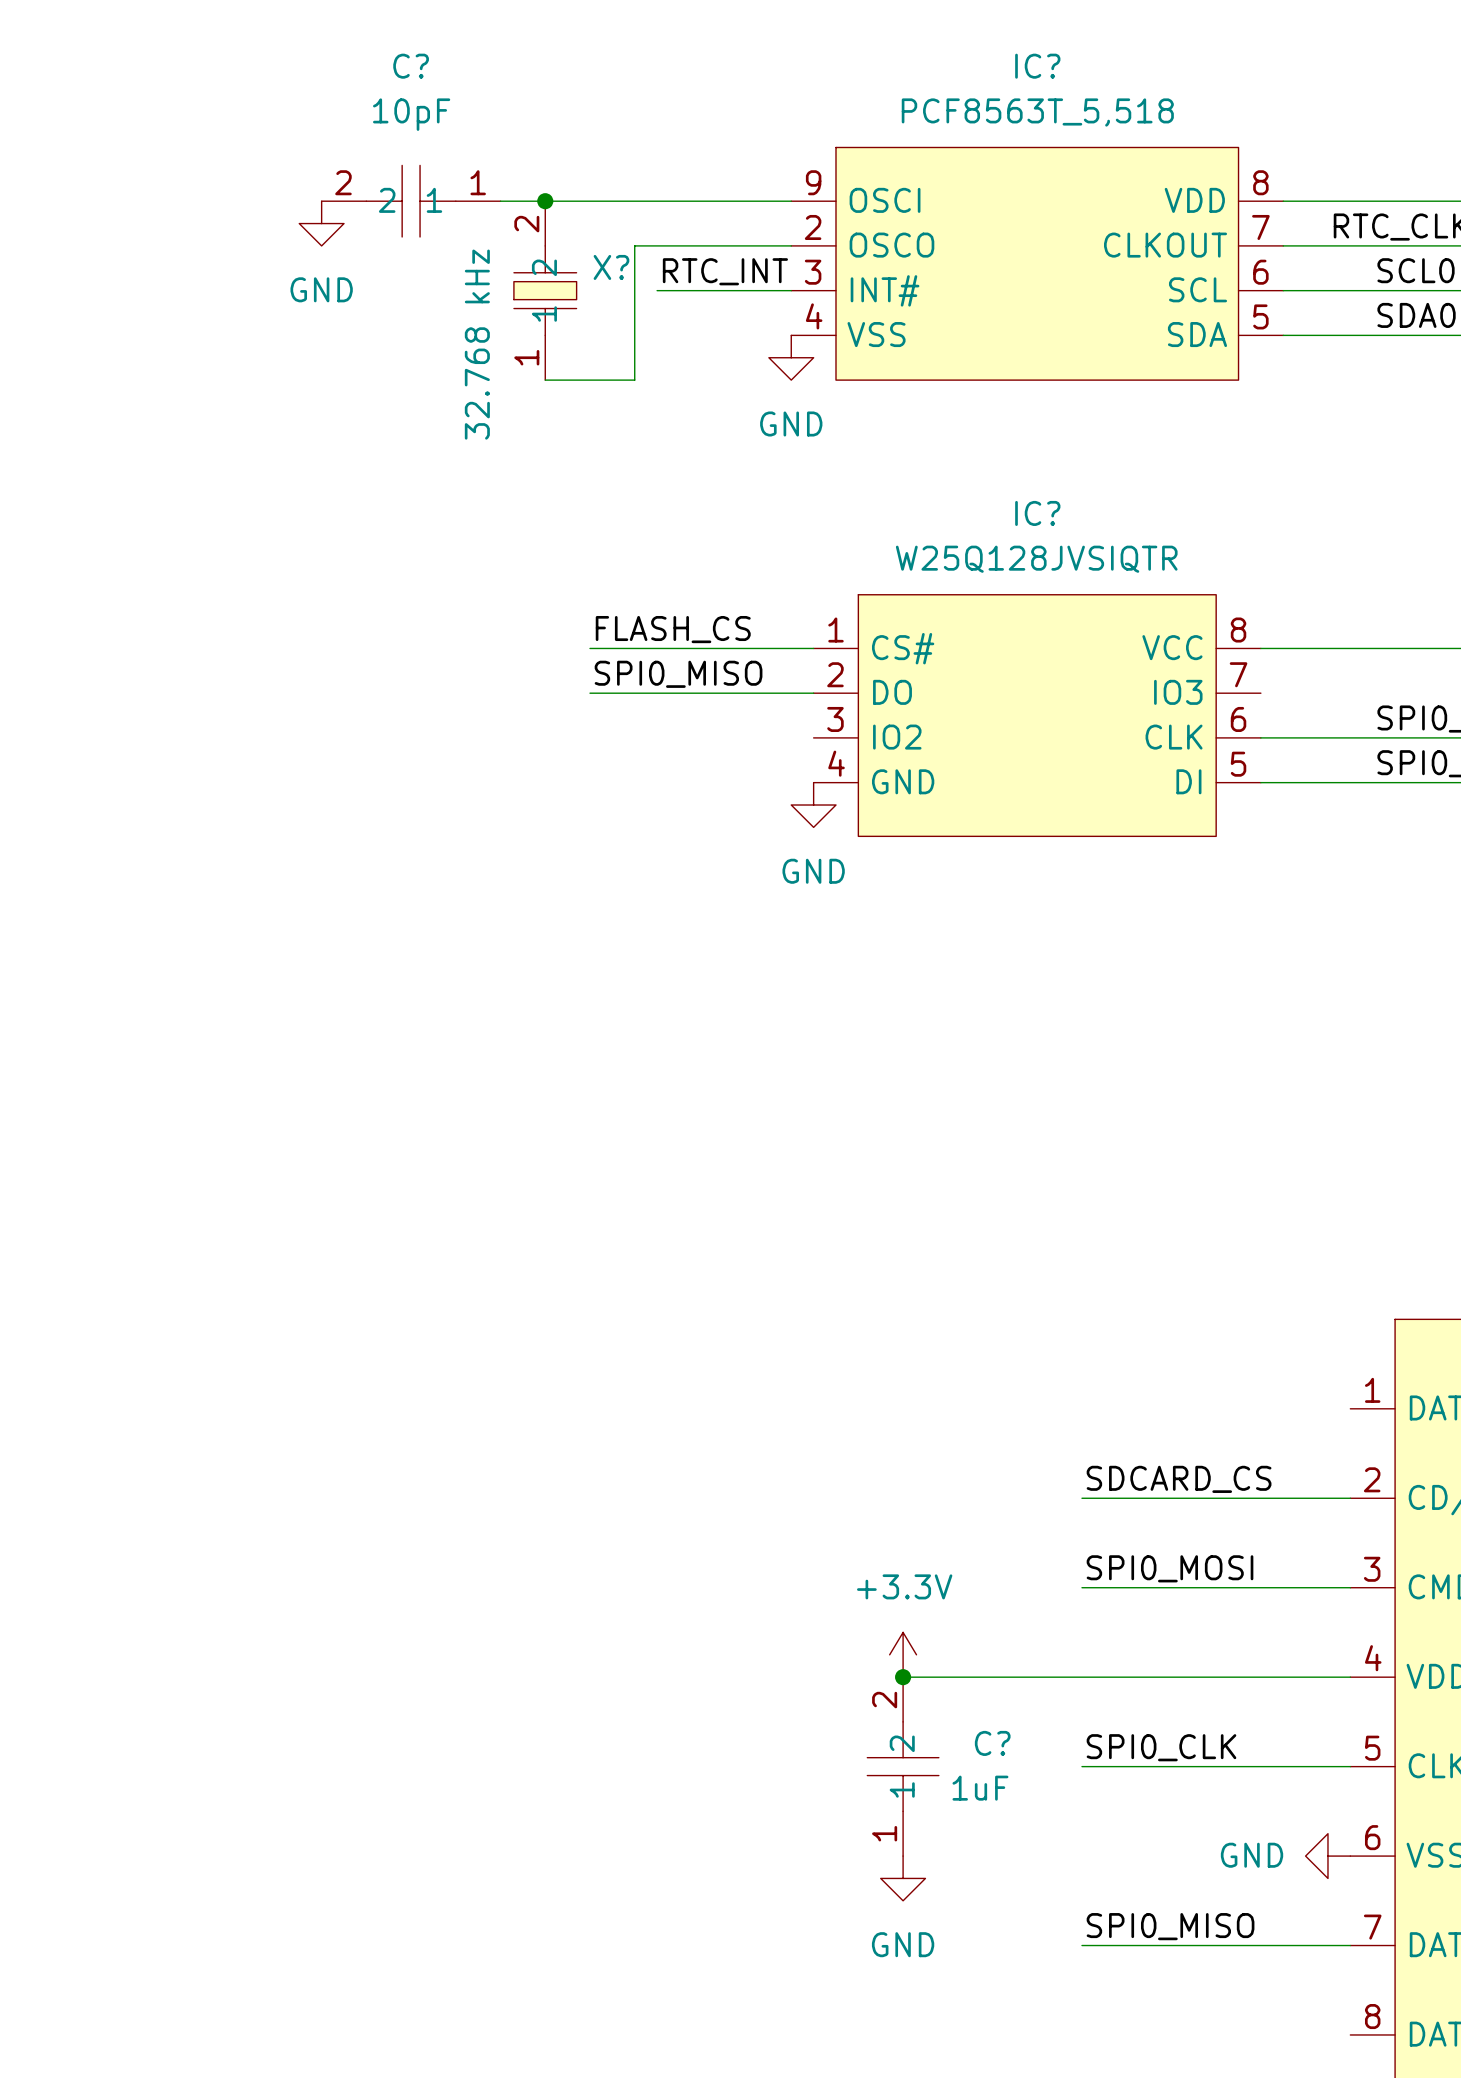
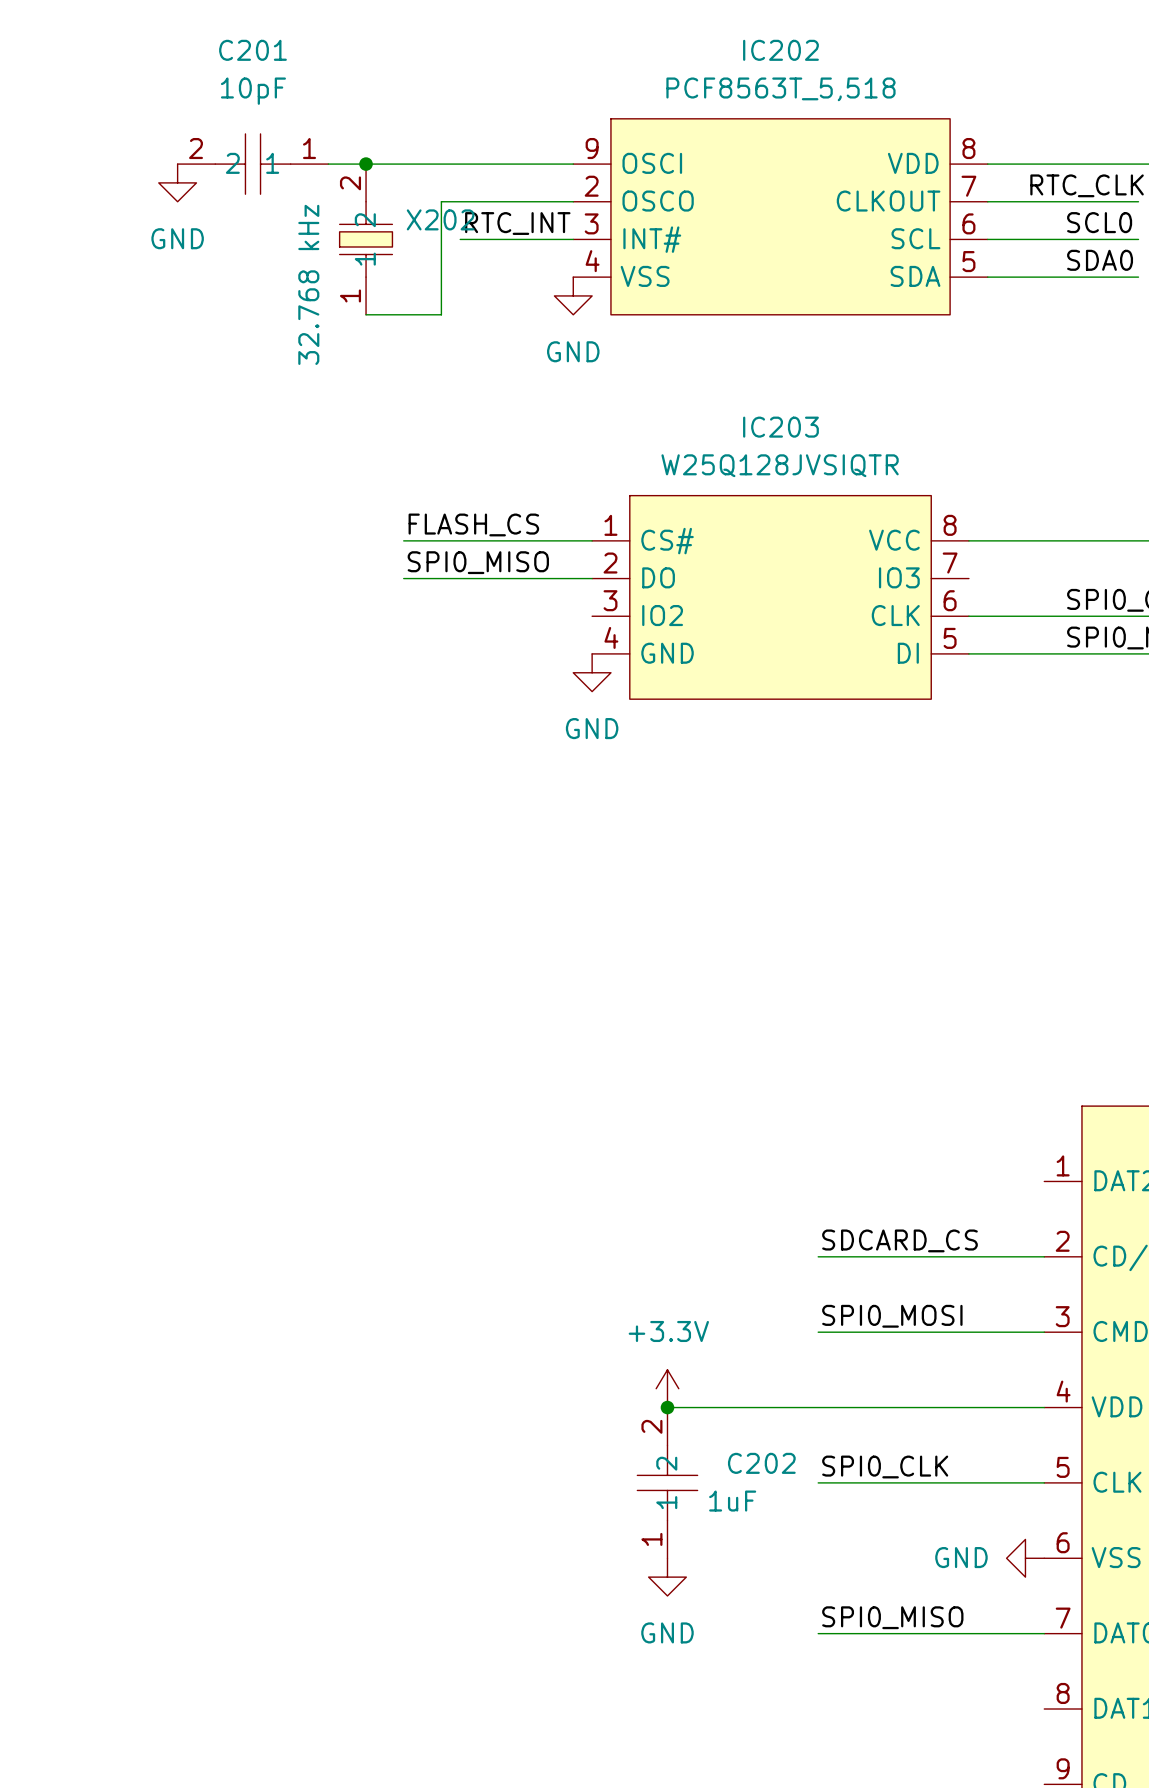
C? name: C? (411, 66) -> C201 (252, 50)
IC? name: IC? (1037, 66) -> IC202 (780, 50)
X? name: X? (611, 267) -> X202 (440, 219)
IC? name: IC? (1037, 513) -> IC203 (780, 427)
C? name: C? (992, 1743) -> C202 (761, 1463)

